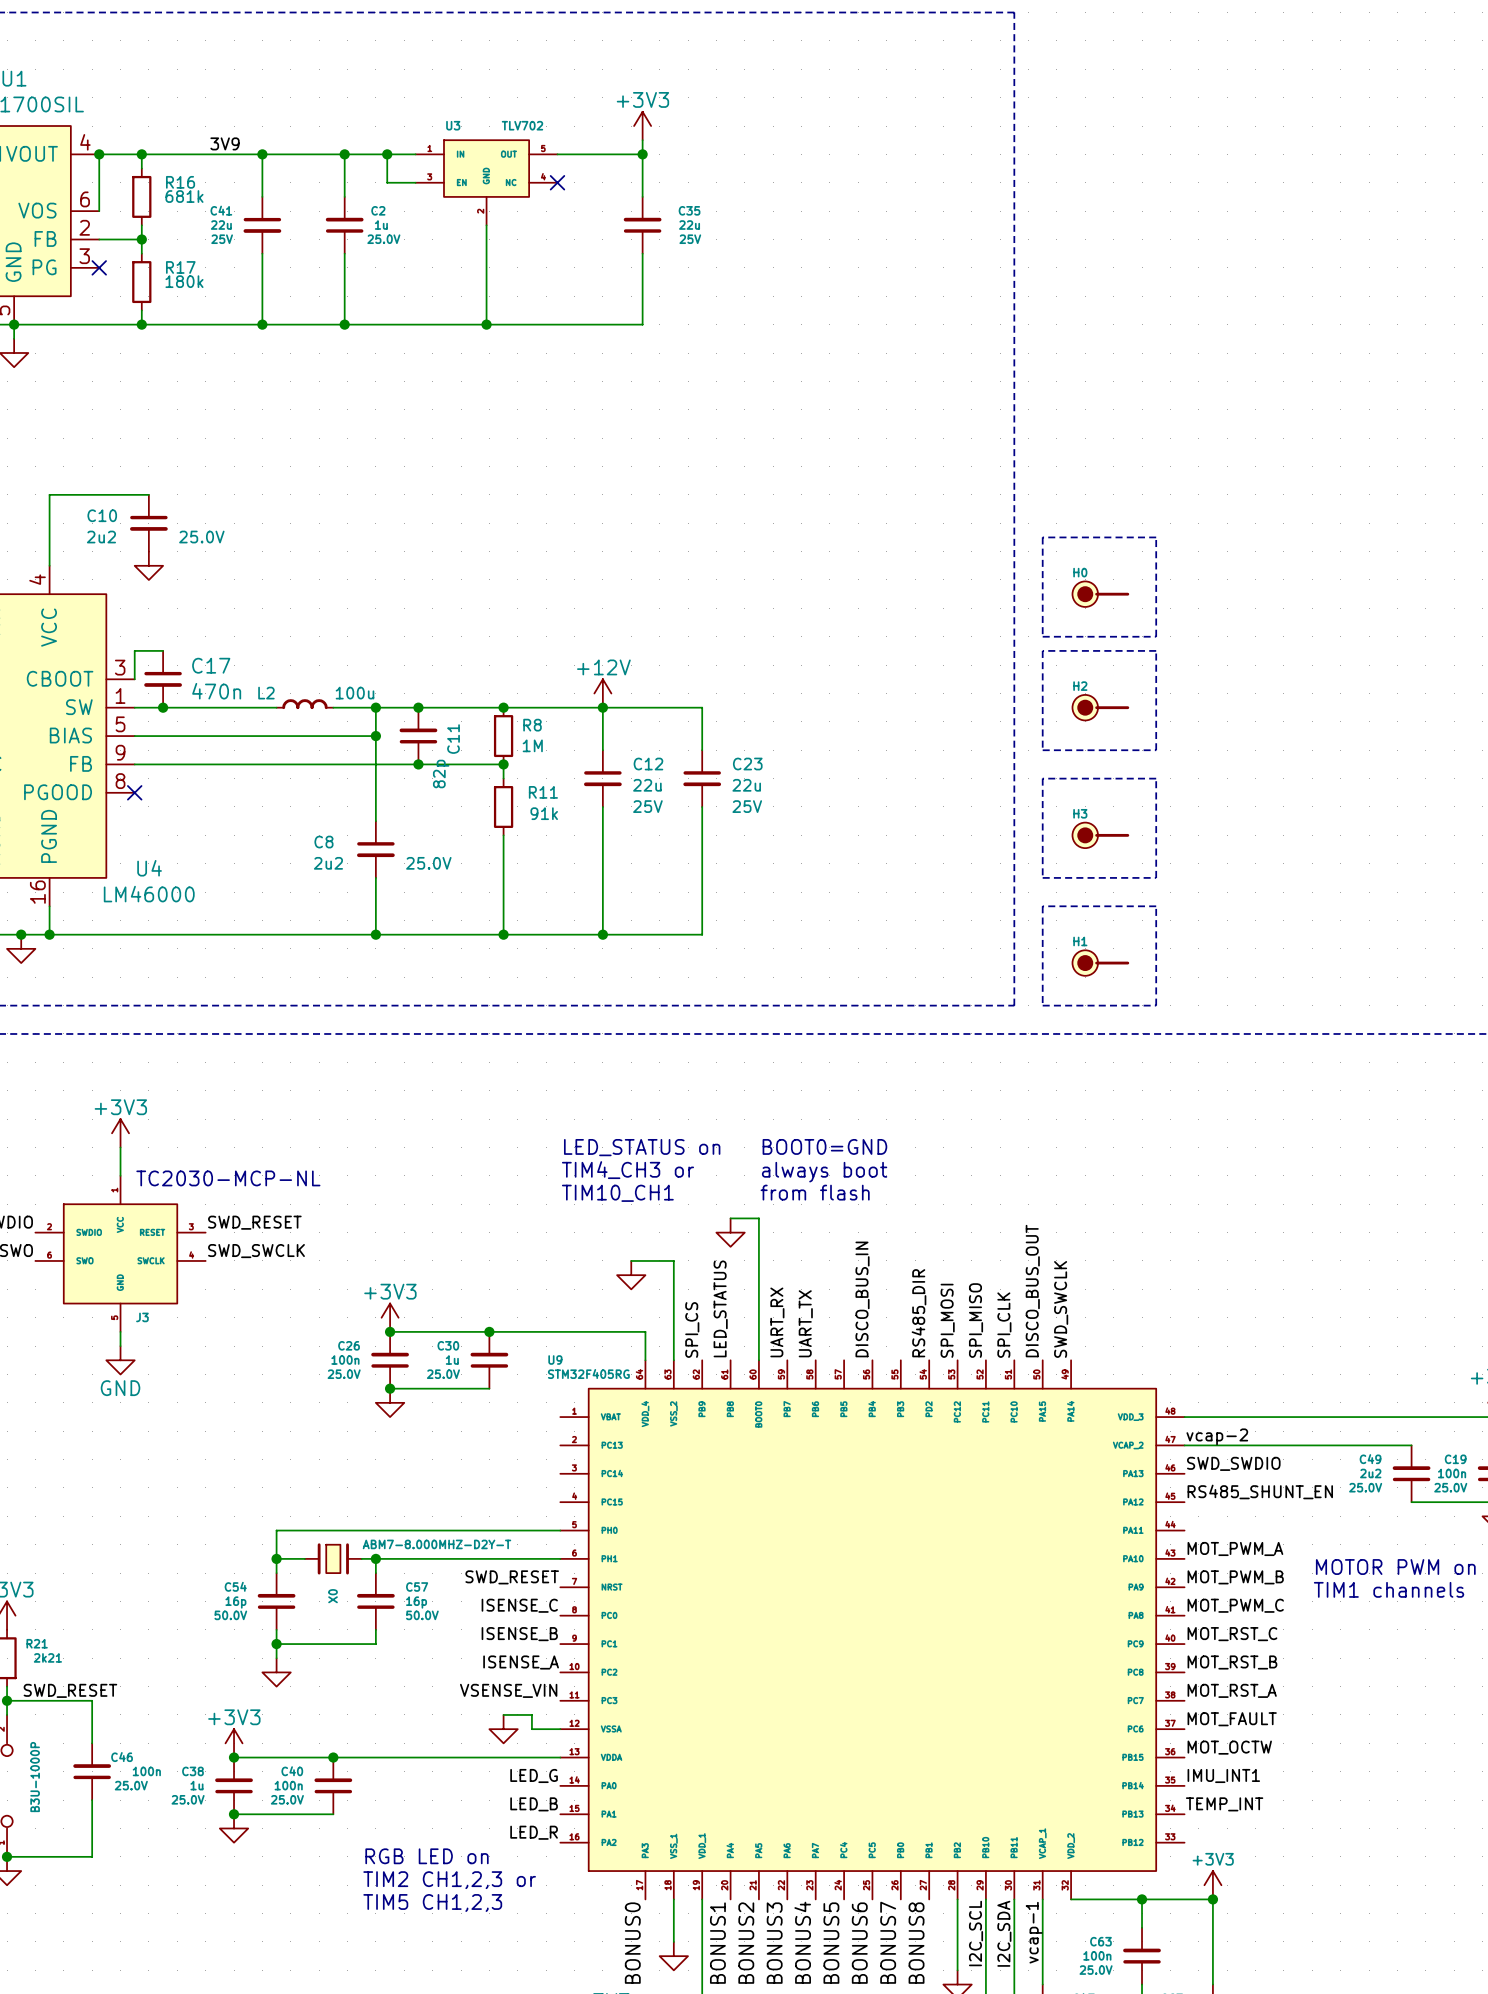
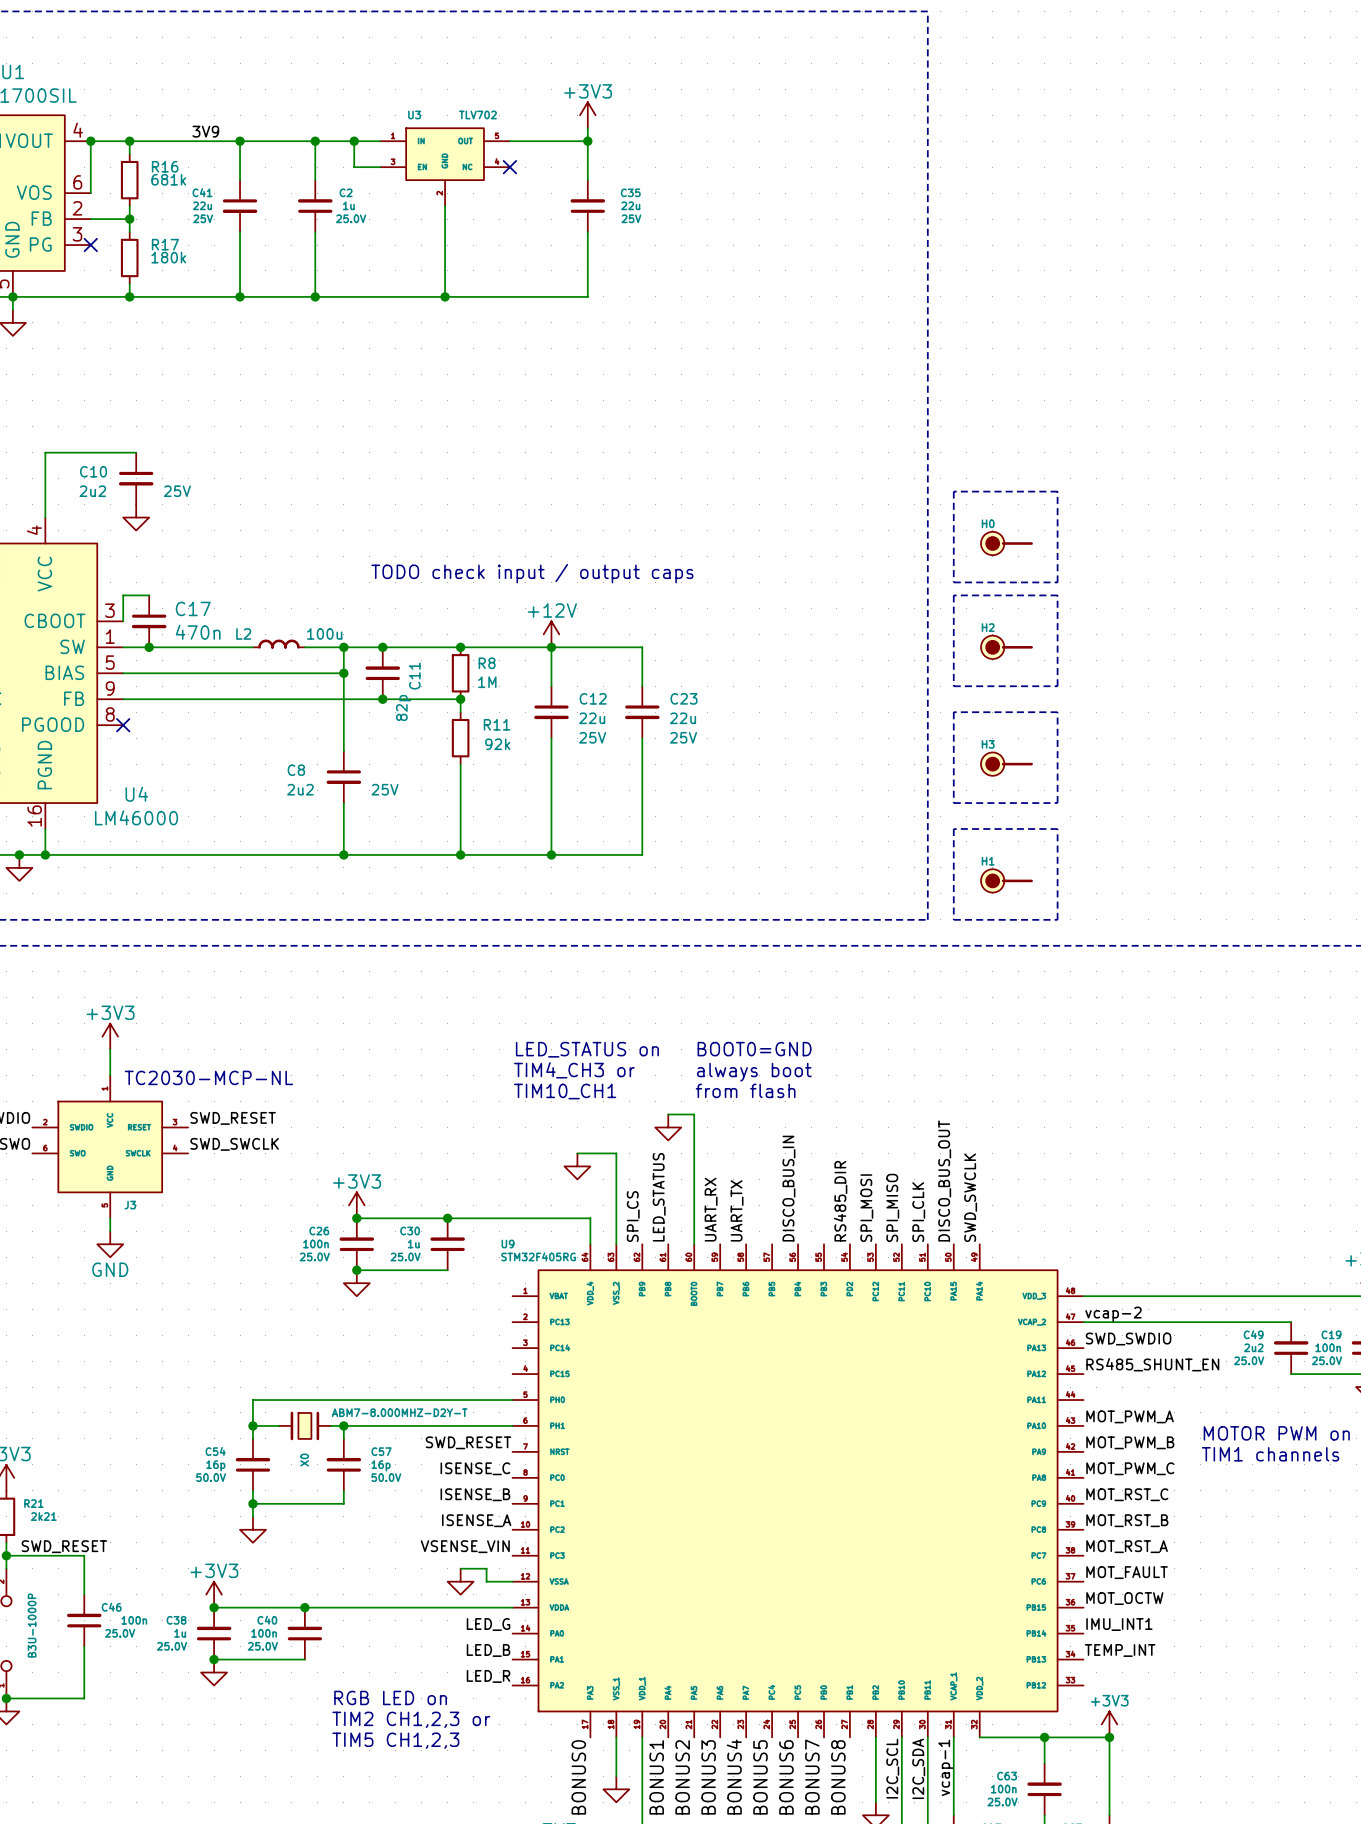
C10 text: 25.0V (201, 537) -> 25V (177, 491)
text: none -> TODO check input / output caps (532, 573)
R11 value: 91k (544, 813) -> 92k (497, 744)
C8 text: 25.0V (428, 863) -> 25V (385, 789)

